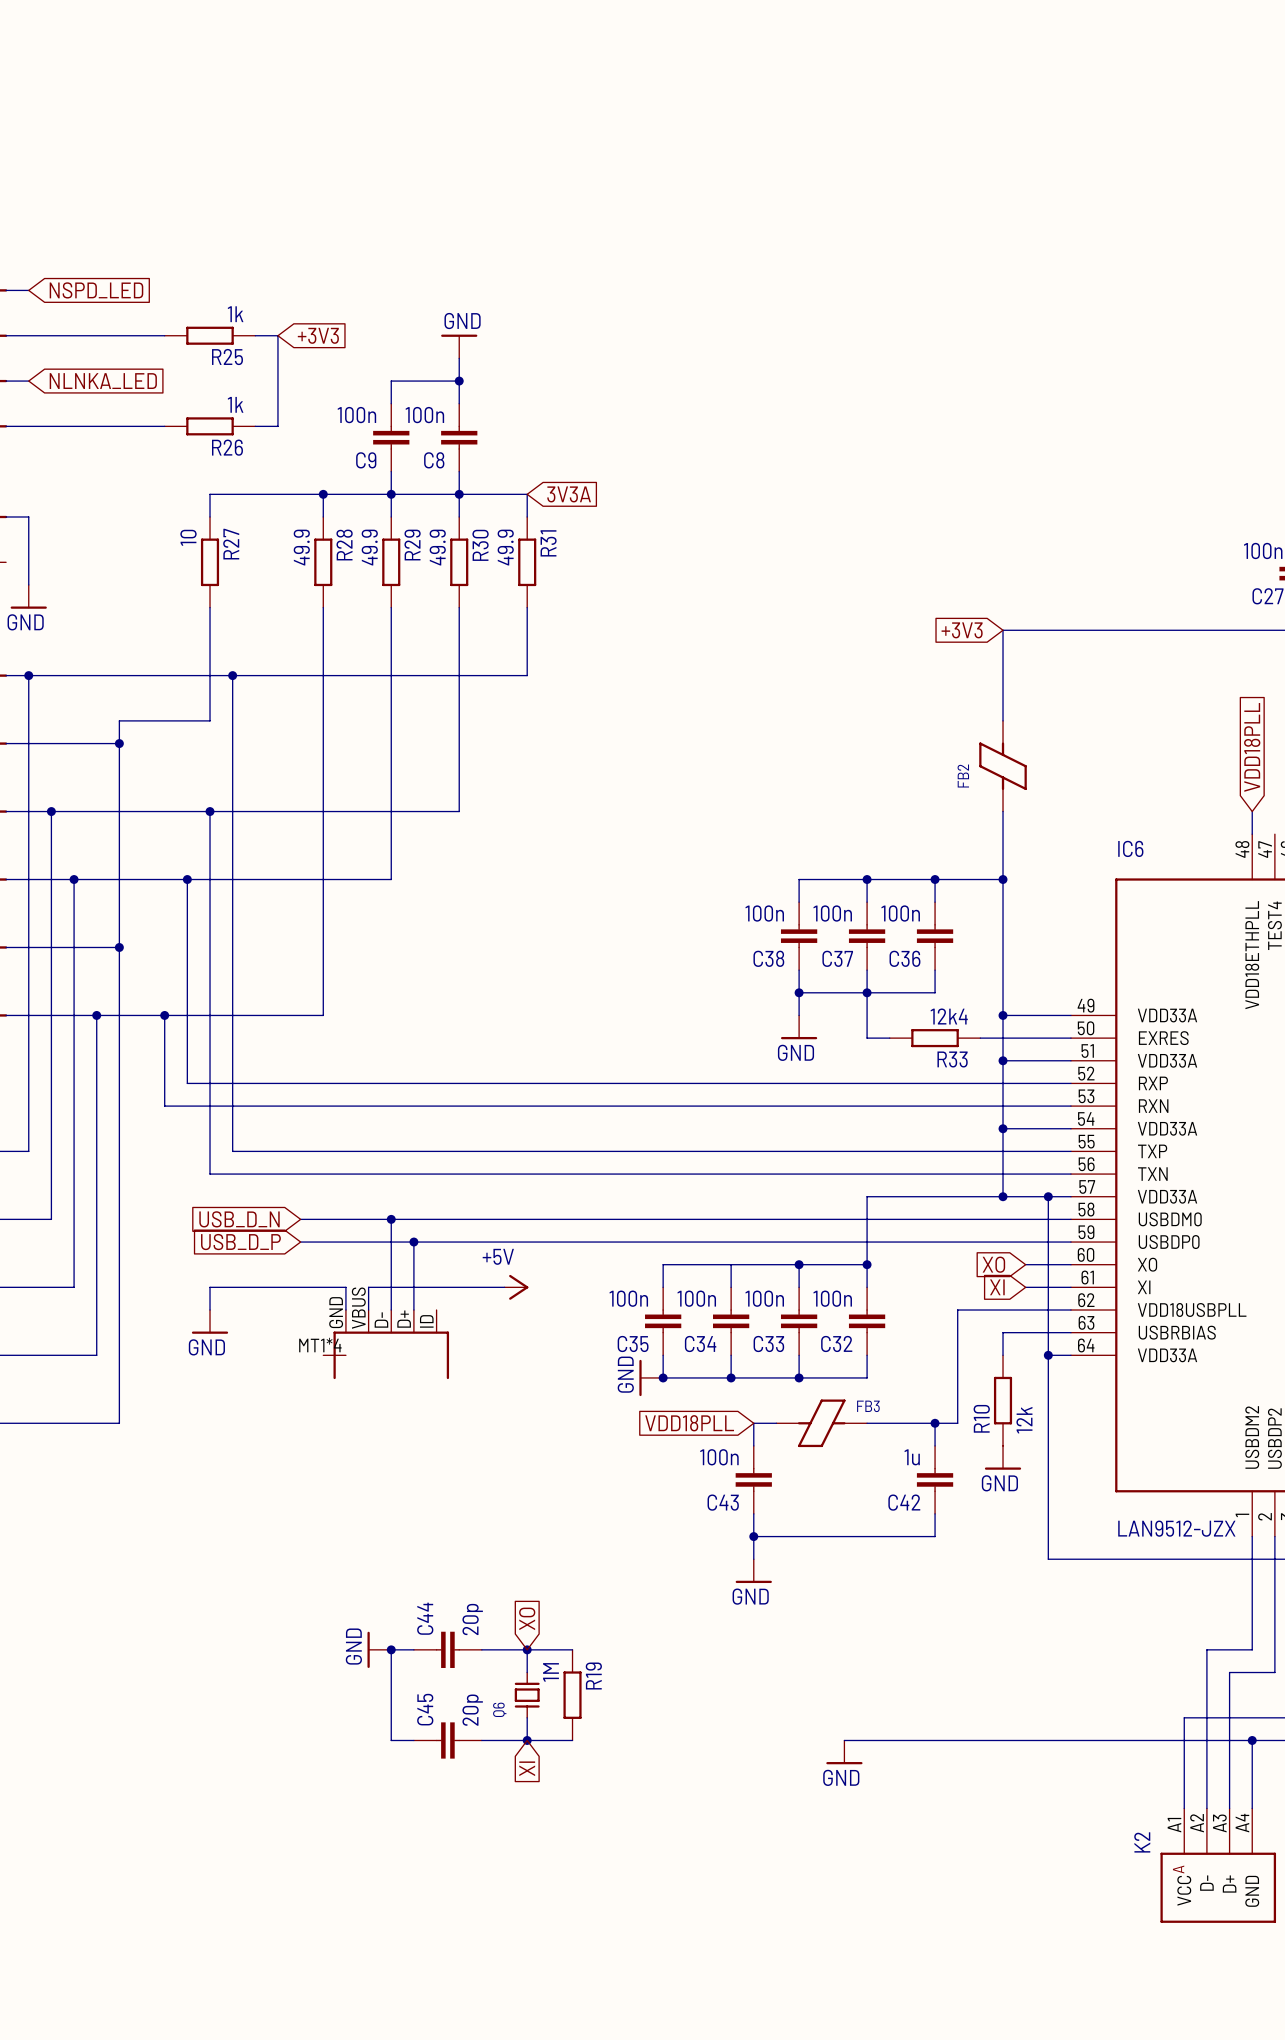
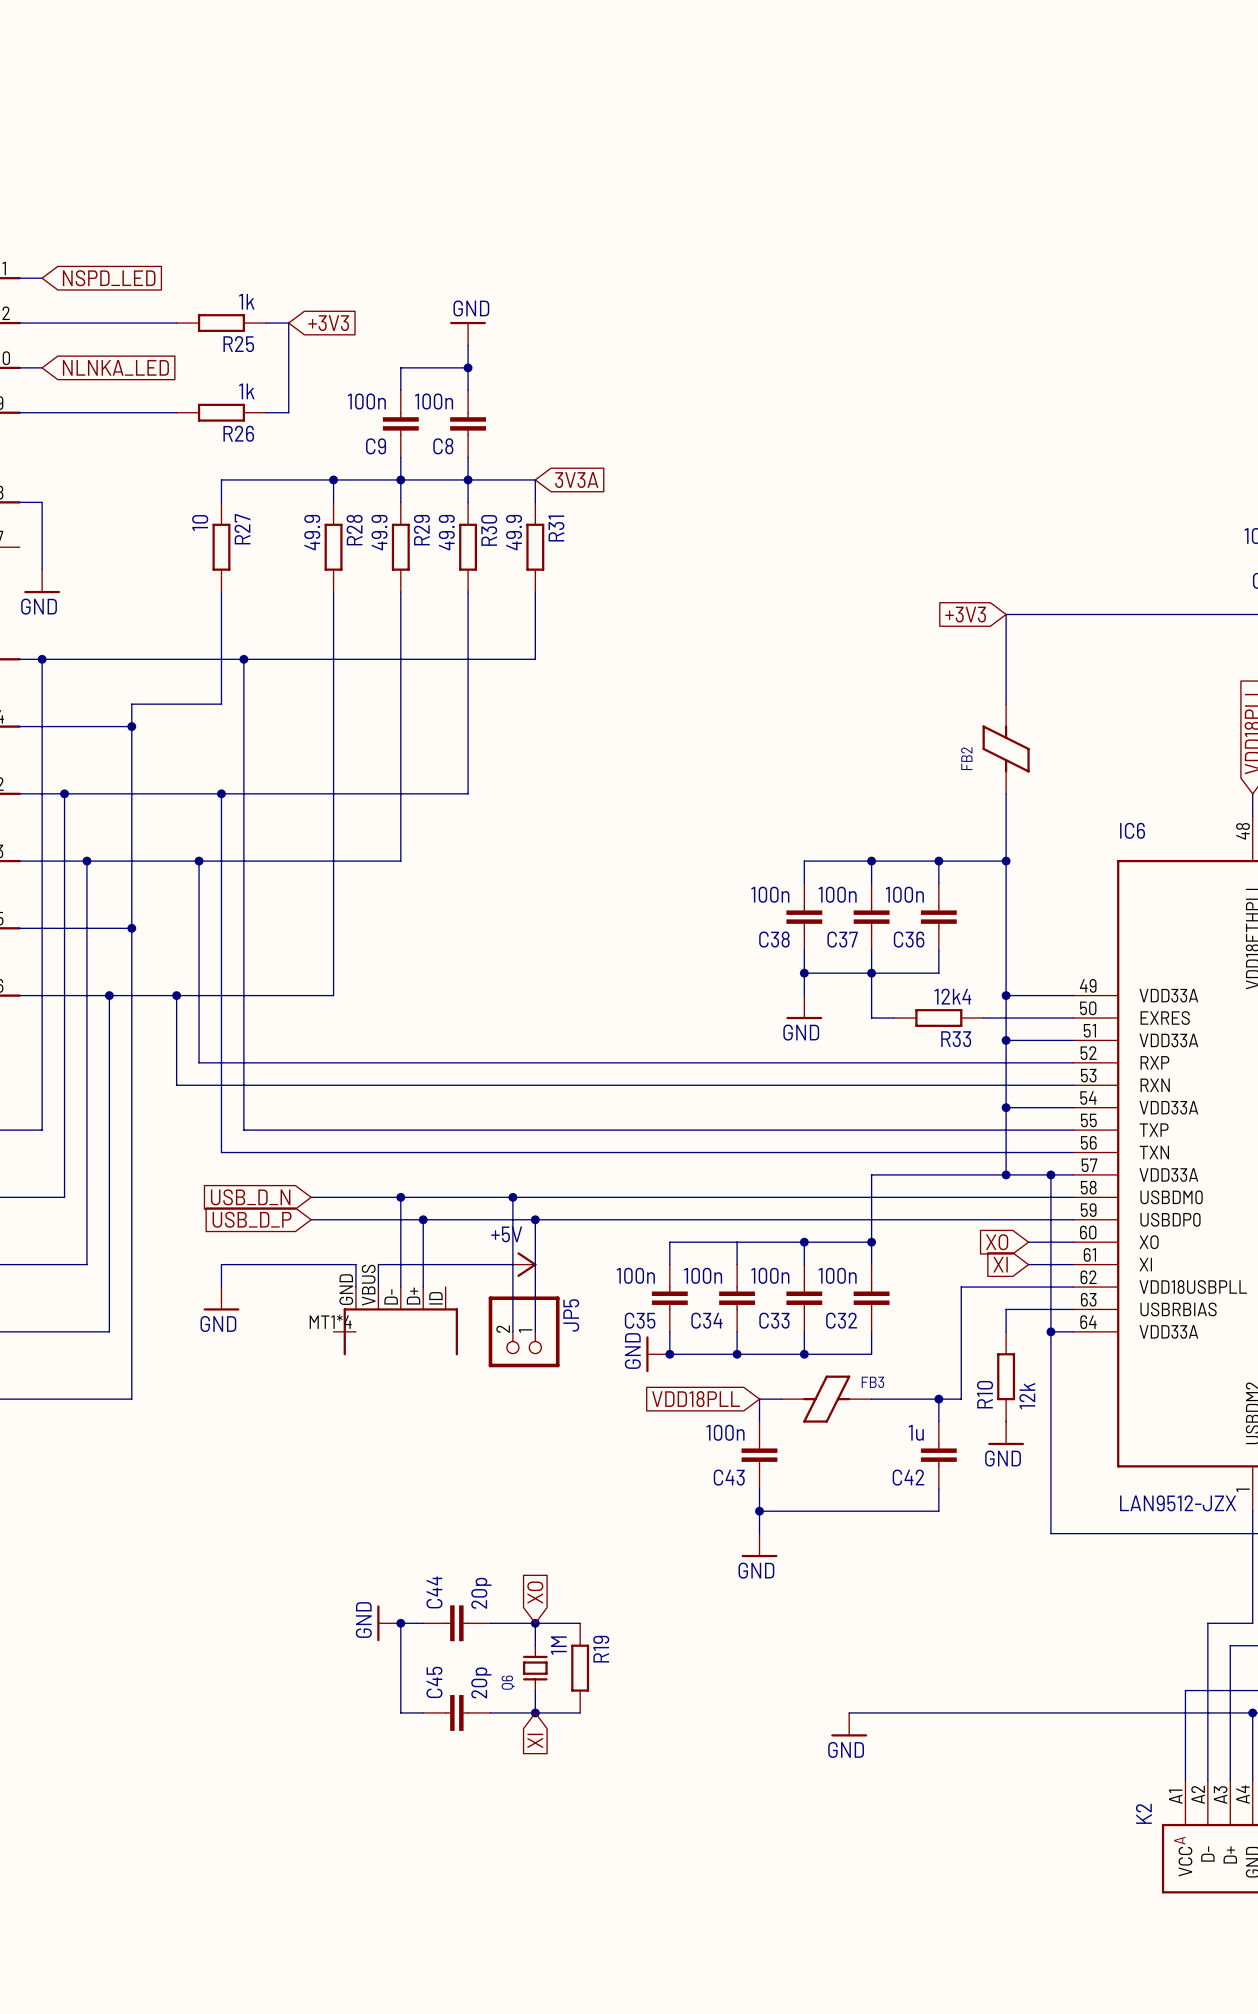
wire: none -> (512, 1197) (512, 1331)
junction: none -> (512, 1197)
wire: none -> (535, 1219) (535, 1331)
junction: none -> (535, 1219)
JP5: none -> (524, 1331)

